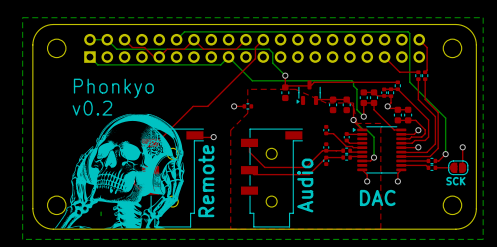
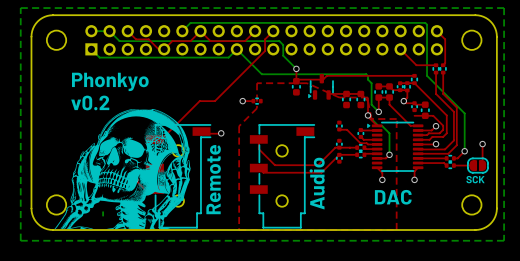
part footprint: [394, 106, 402, 124] -> [411, 101, 418, 113]

